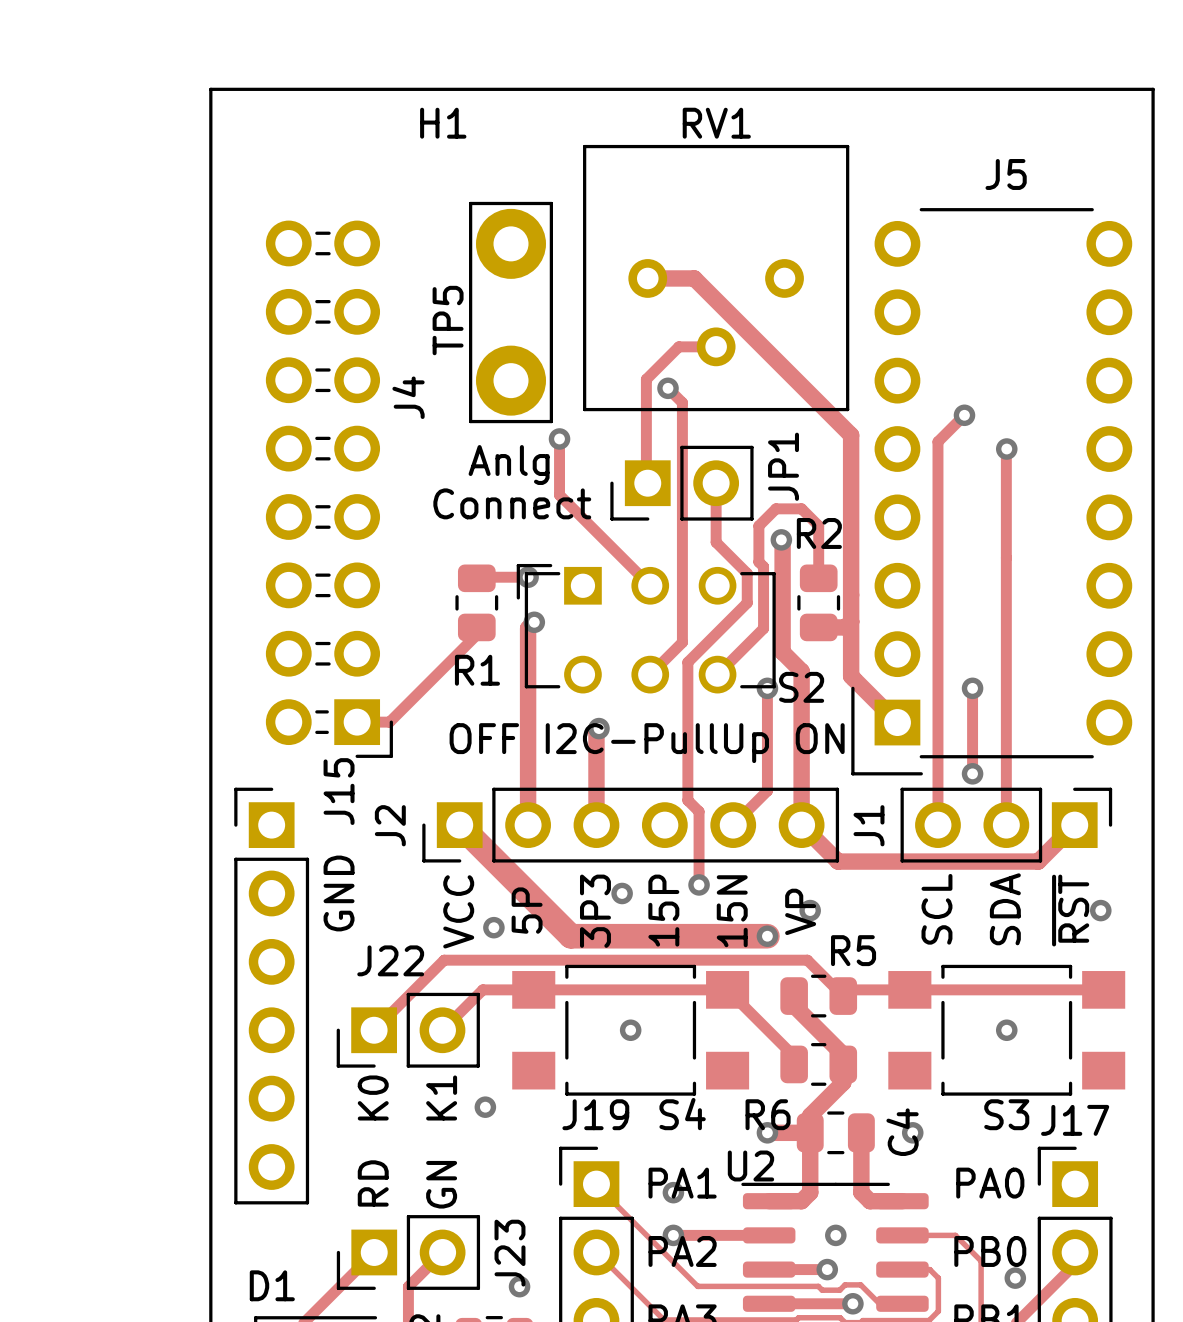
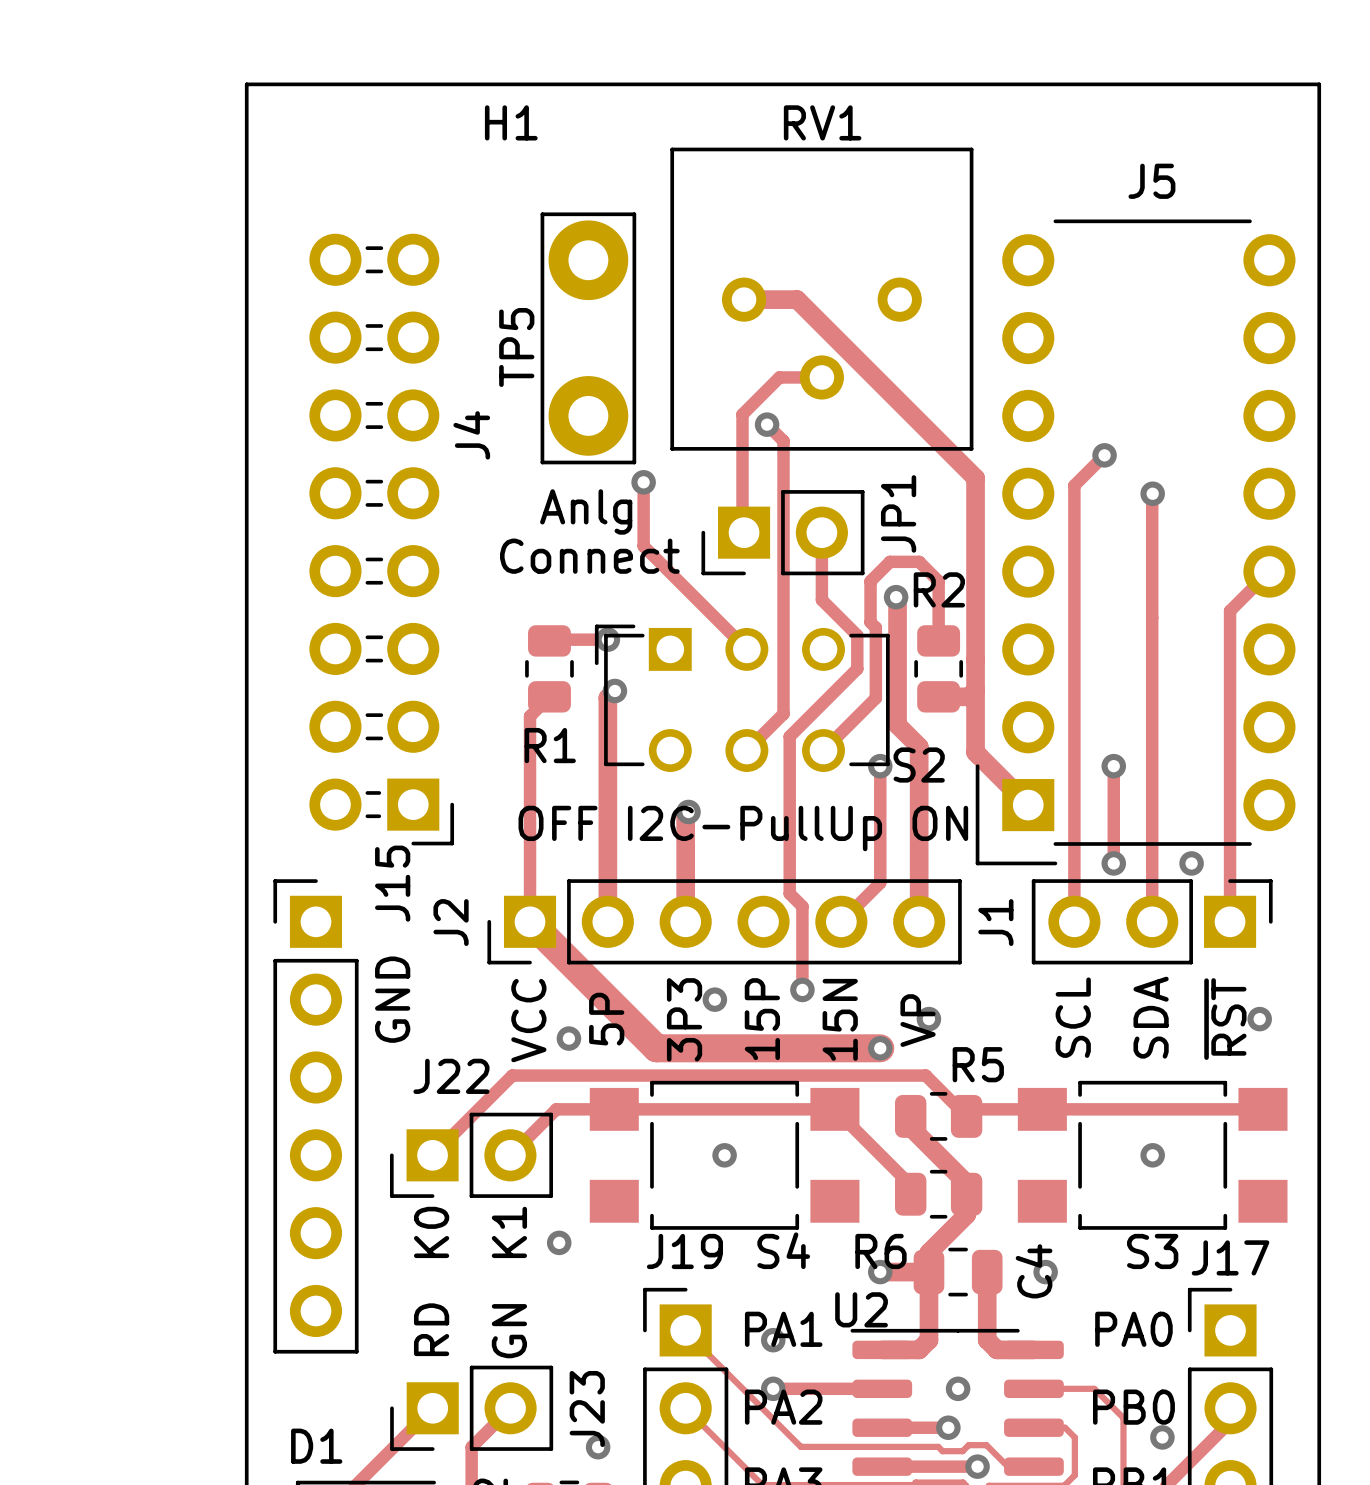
track: (476, 627) (476, 634) (389, 722) (357, 722) -> (549, 696) (530, 716) (530, 921)
via: none -> (1191, 863)
track: (801, 825) (838, 861) (1038, 861) (1074, 825) -> (1269, 571) (1230, 610) (1230, 921)

